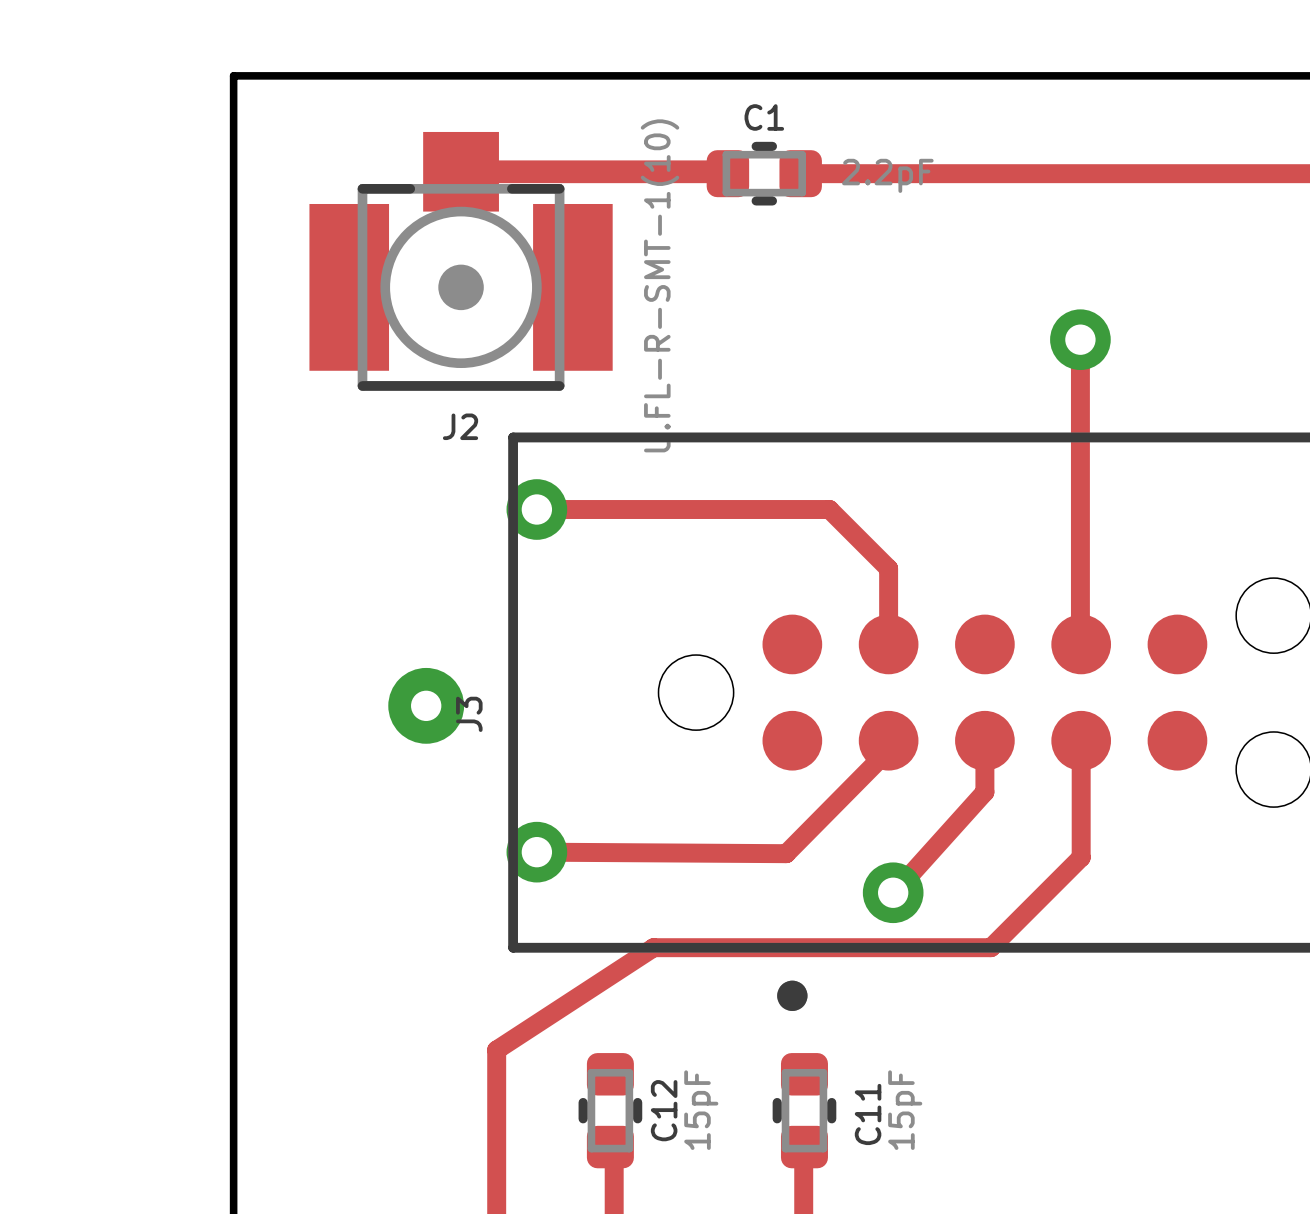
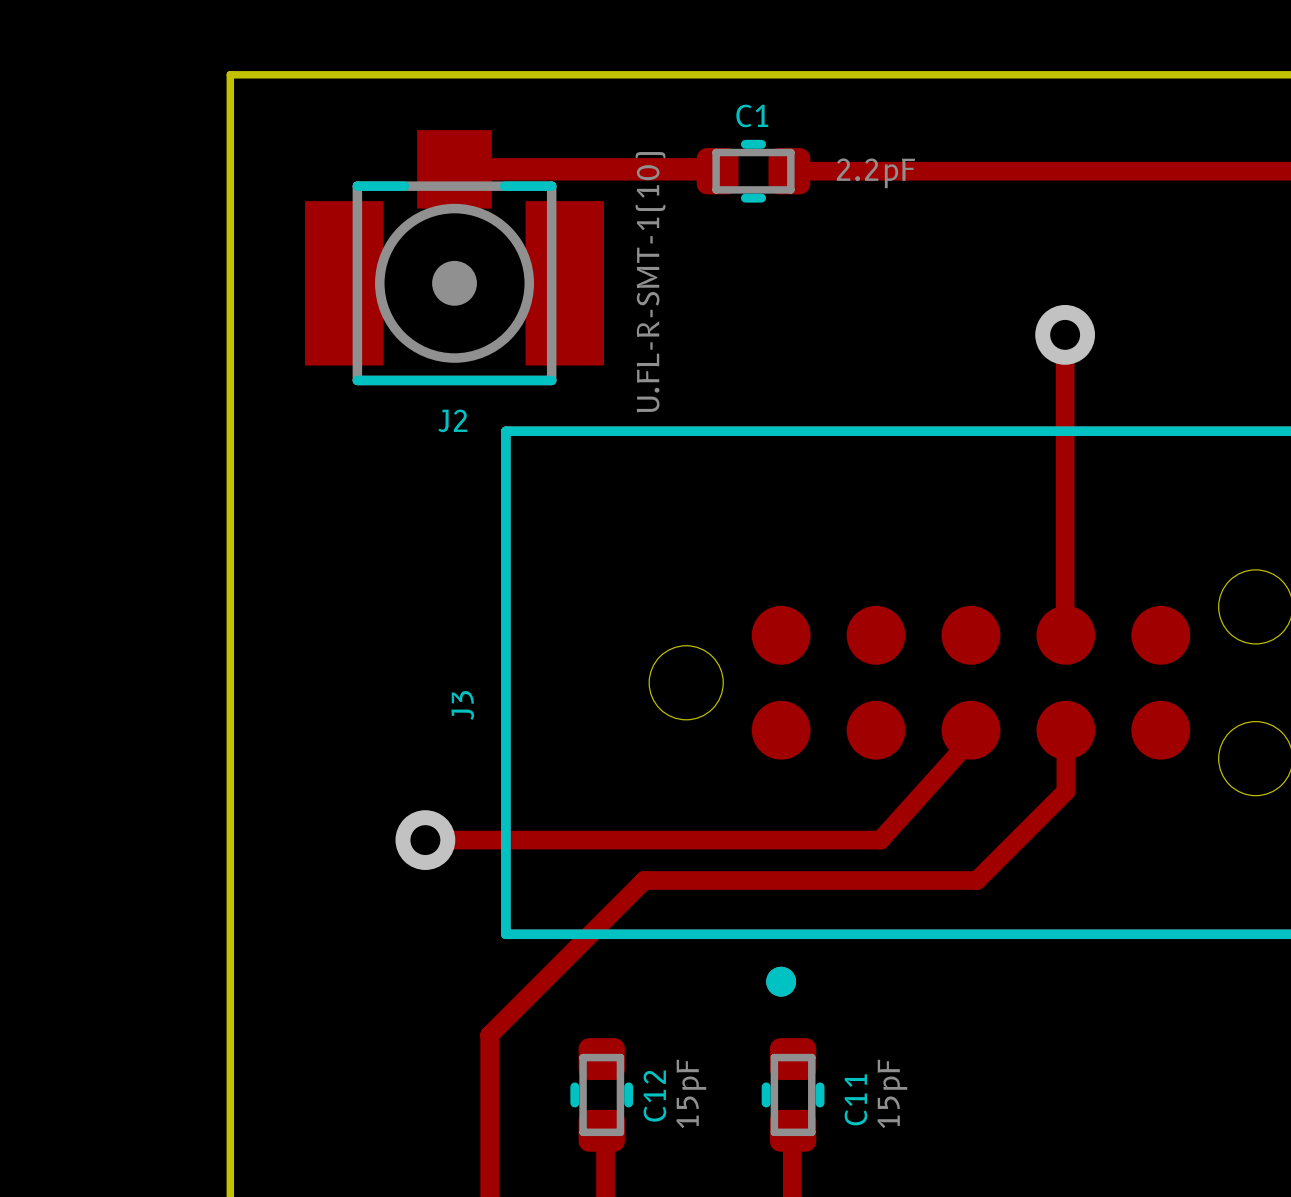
track: (536, 509) (829, 509) (888, 568) (888, 634) -> none
via: (536, 509) -> none
via: (426, 705) -> none
track: (888, 750) (786, 853) (536, 852) -> none
track: (984, 750) (984, 792) (893, 894) -> (970, 739) (880, 840) (425, 840)
track: (1081, 802) (1081, 857) (990, 947) (653, 947) (496, 1050) -> (1065, 791) (976, 880) (644, 880) (489, 1035)
via position: (536, 852) -> (425, 840)
via: (893, 892) -> none

